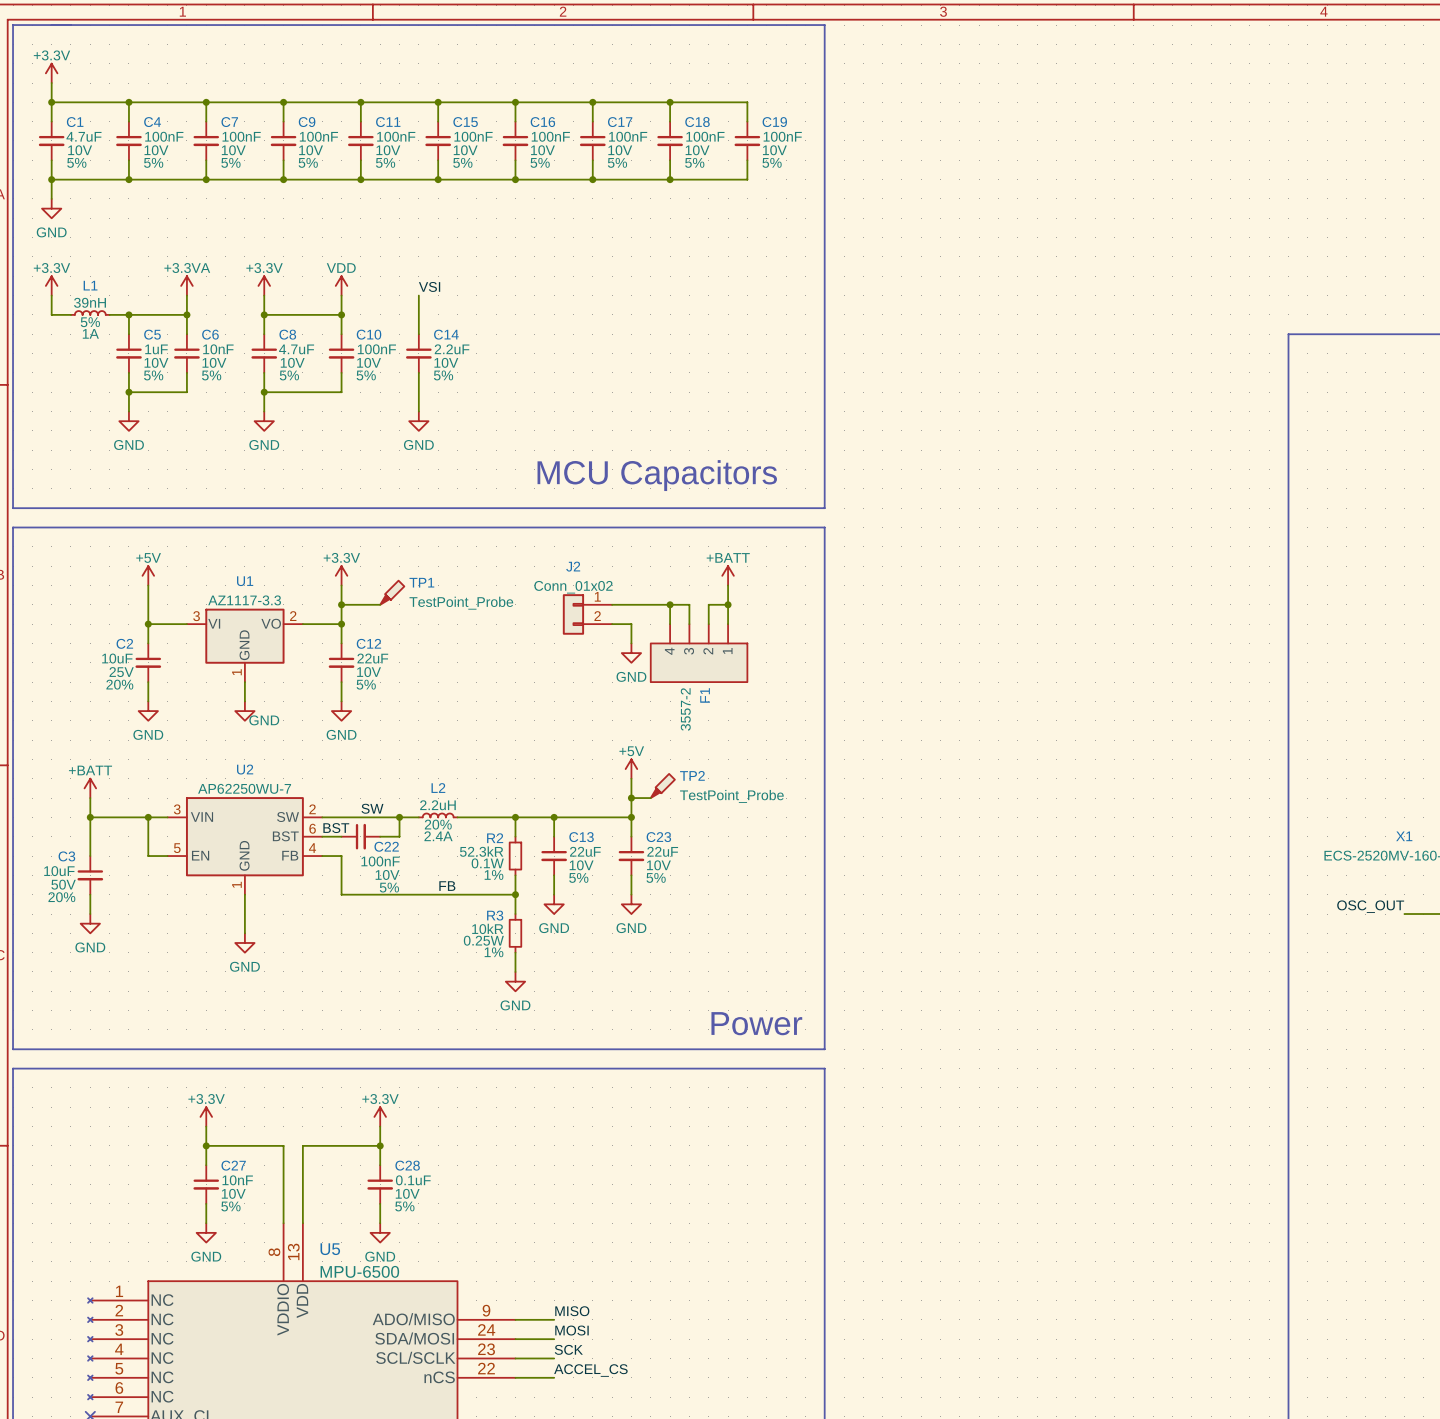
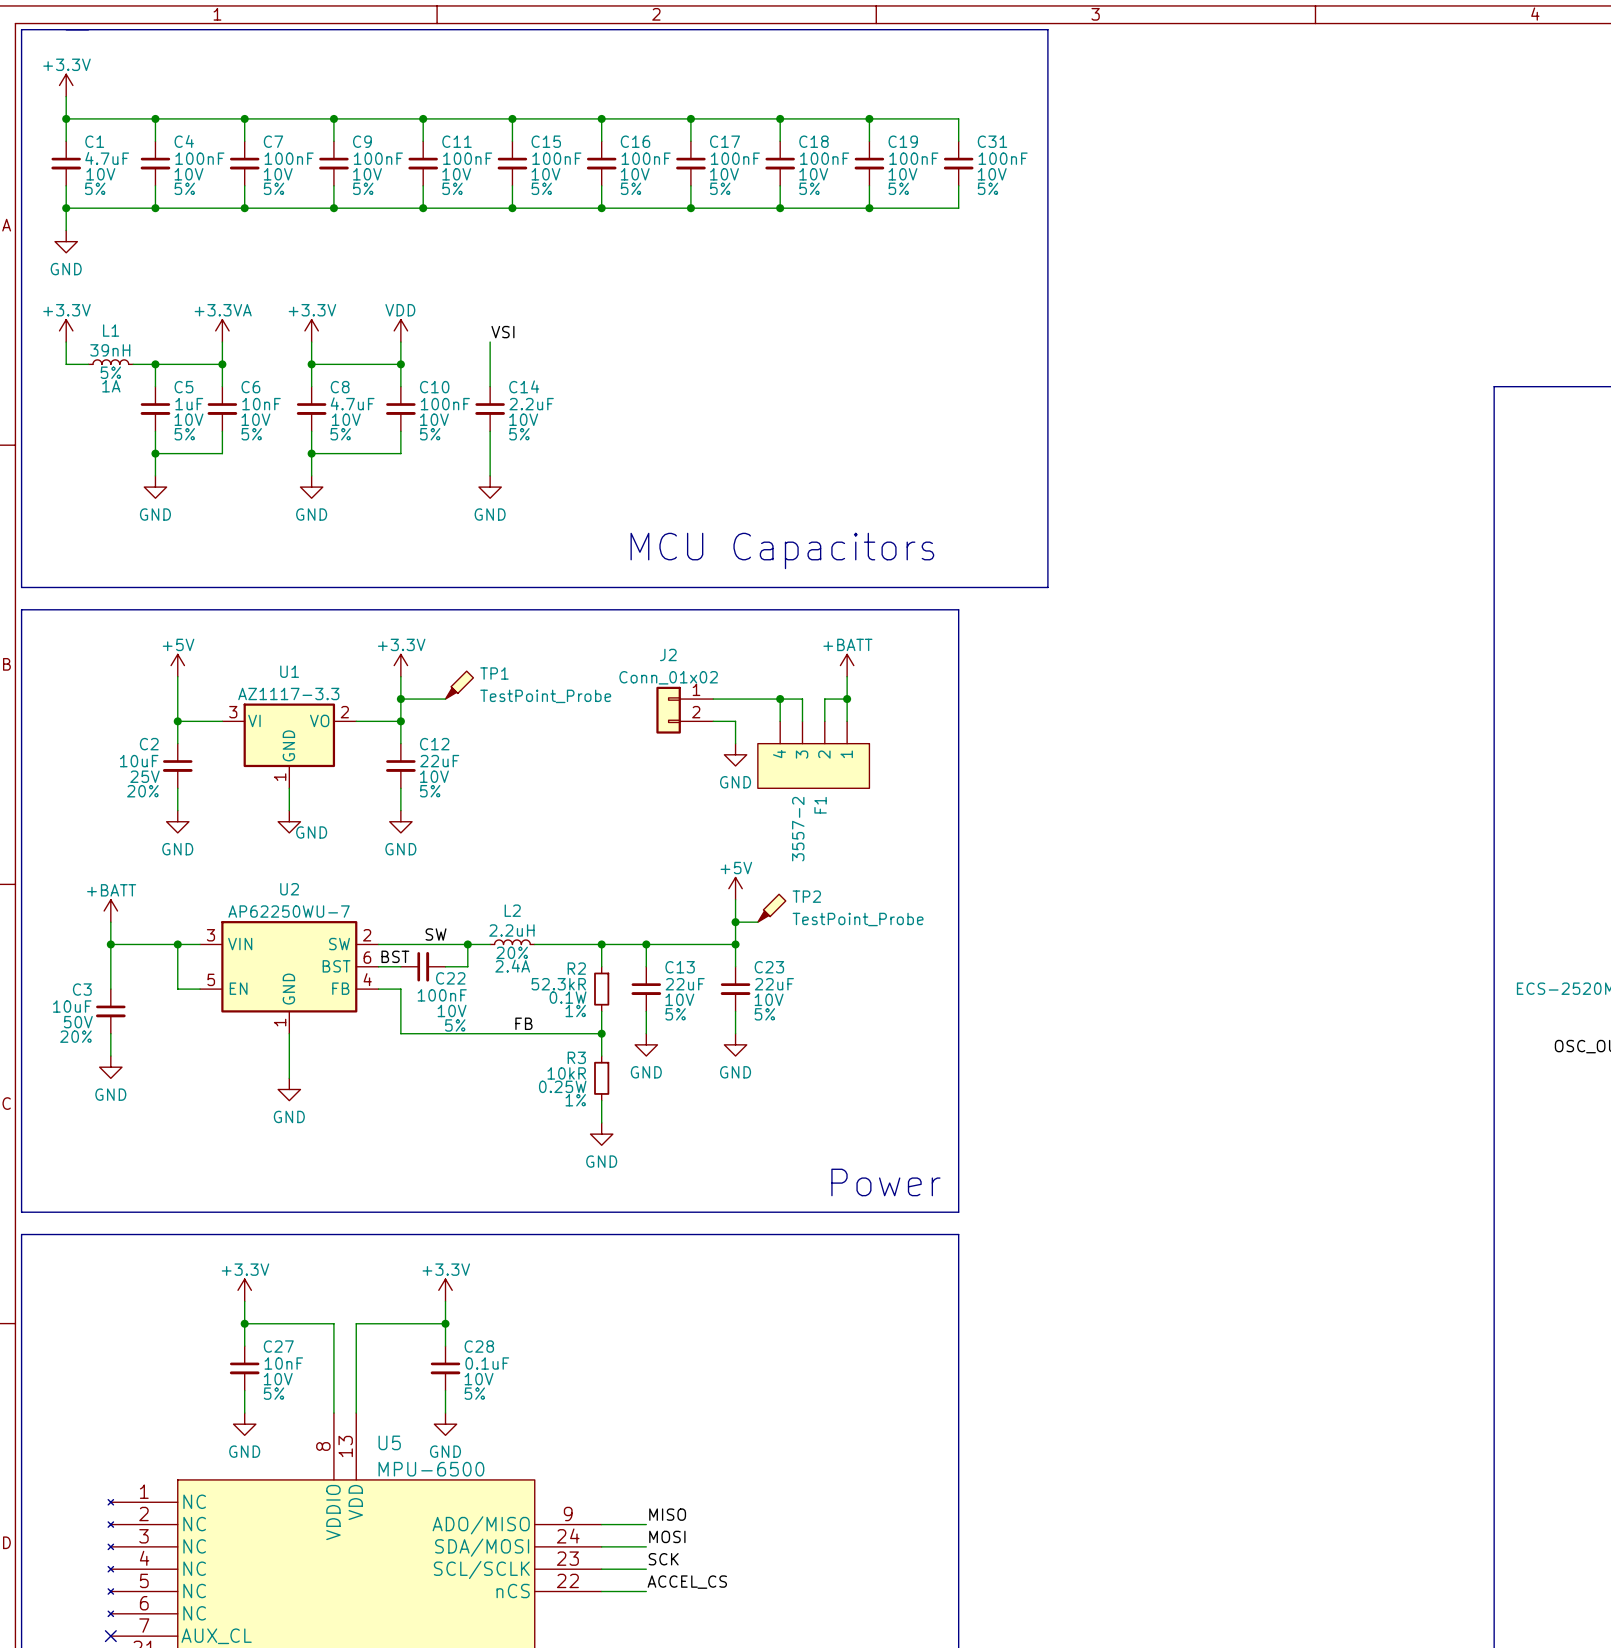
line: (824, 25) (824, 508) -> (958, 29) (1047, 29) (1047, 587) (958, 587)
wire: none -> (869, 118) (958, 118) (958, 141)
junction: none -> (869, 118)
C31: none -> 100nF (958, 163)
wire: none -> (958, 185) (958, 208) (869, 208)
junction: none -> (869, 208)

